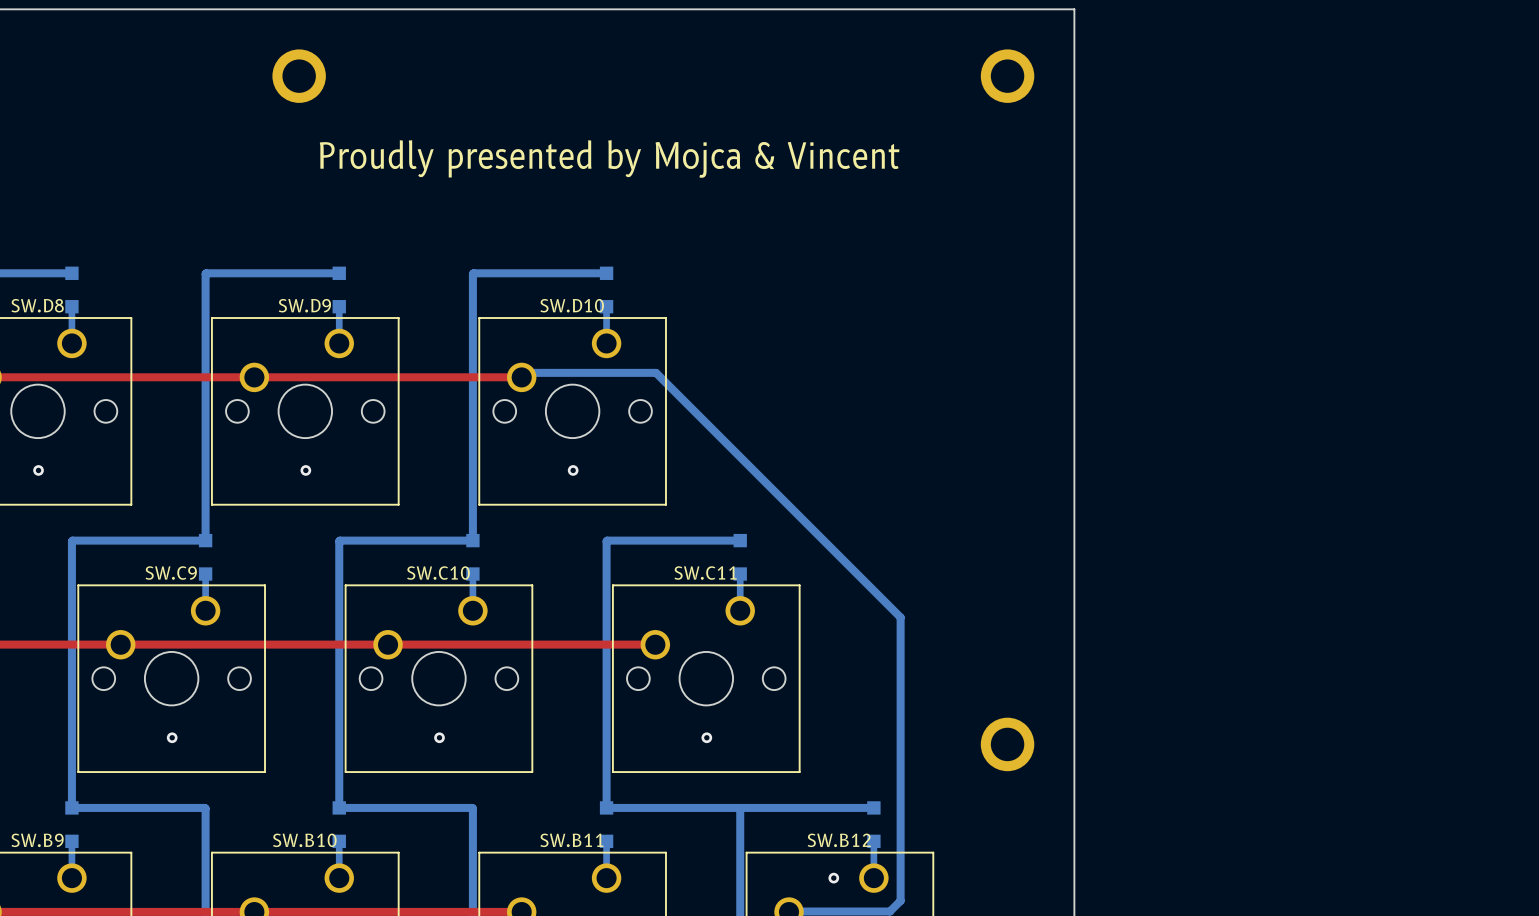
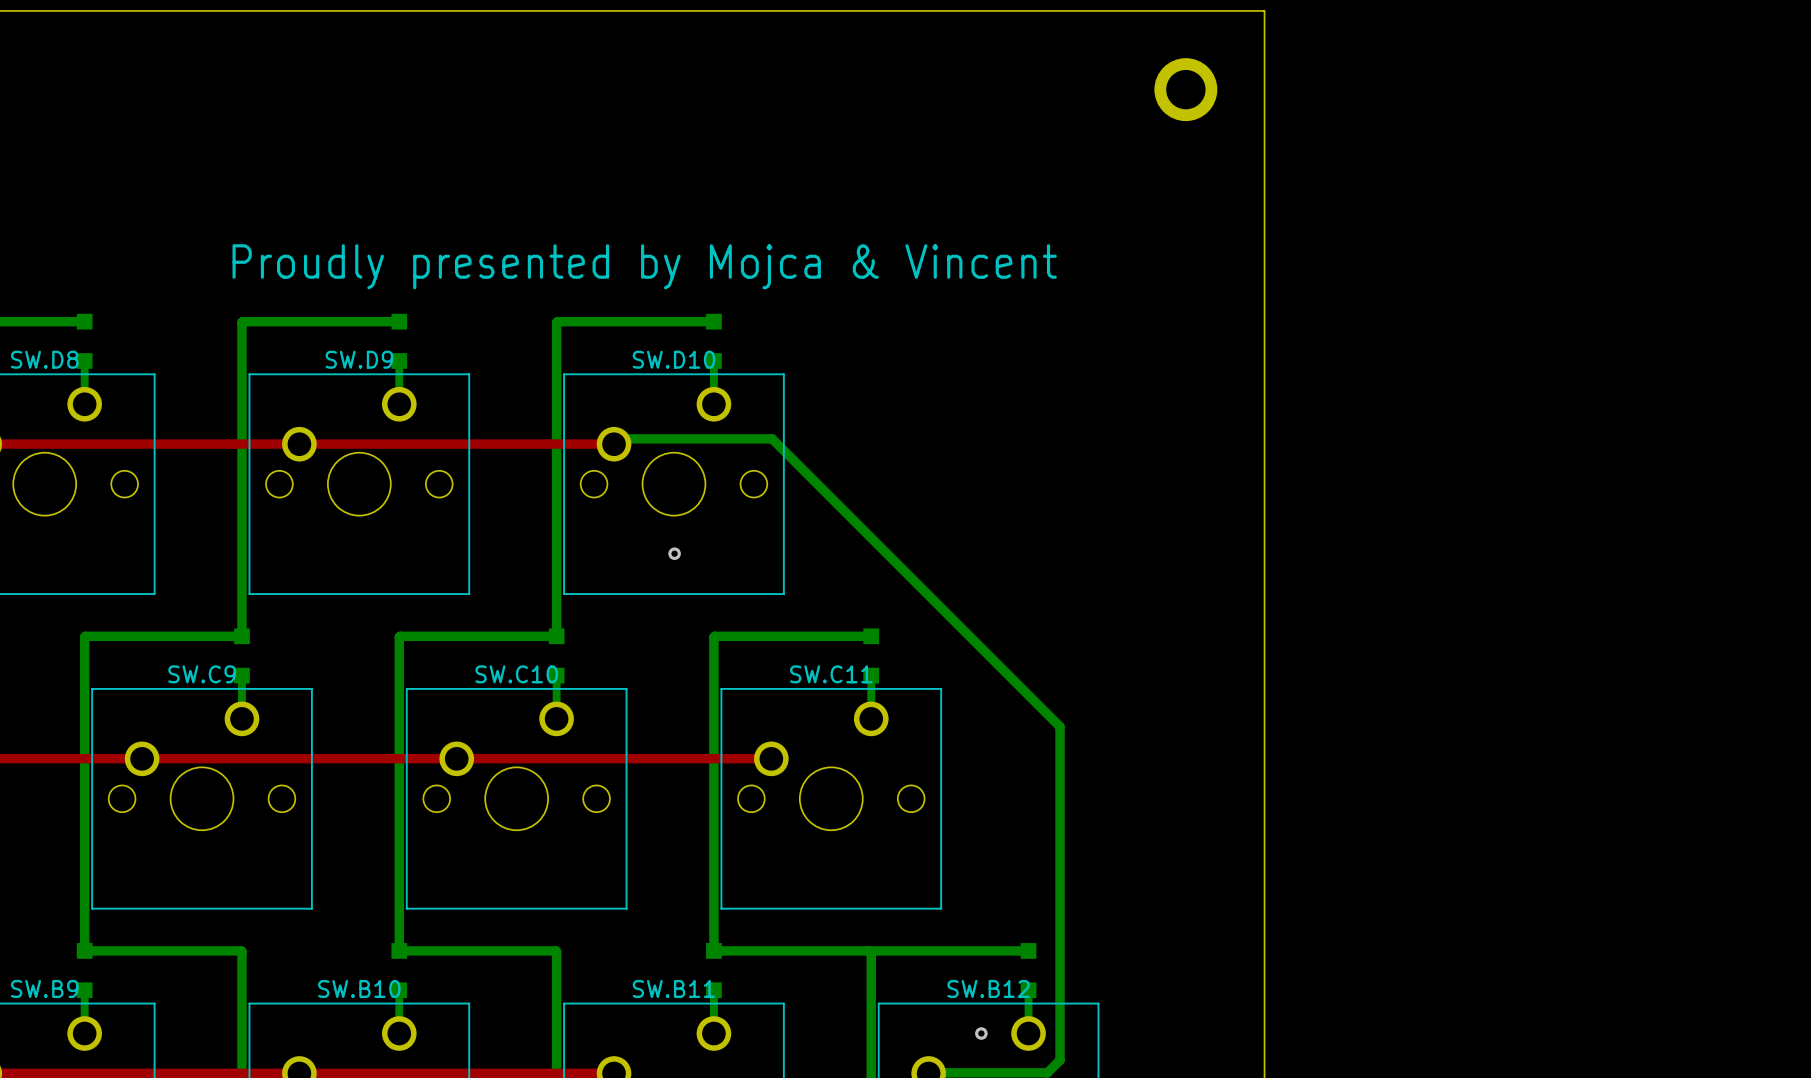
part: (299, 76) -> none
text position: Proudly presented by Mojca & Vincent (609, 159) -> Proudly presented by Mojca & Vincent (644, 266)
via: (38, 470) -> none
via: (305, 470) -> none
via: (172, 737) -> none
via: (439, 737) -> none
via: (706, 737) -> none
part: (1007, 744) -> none

